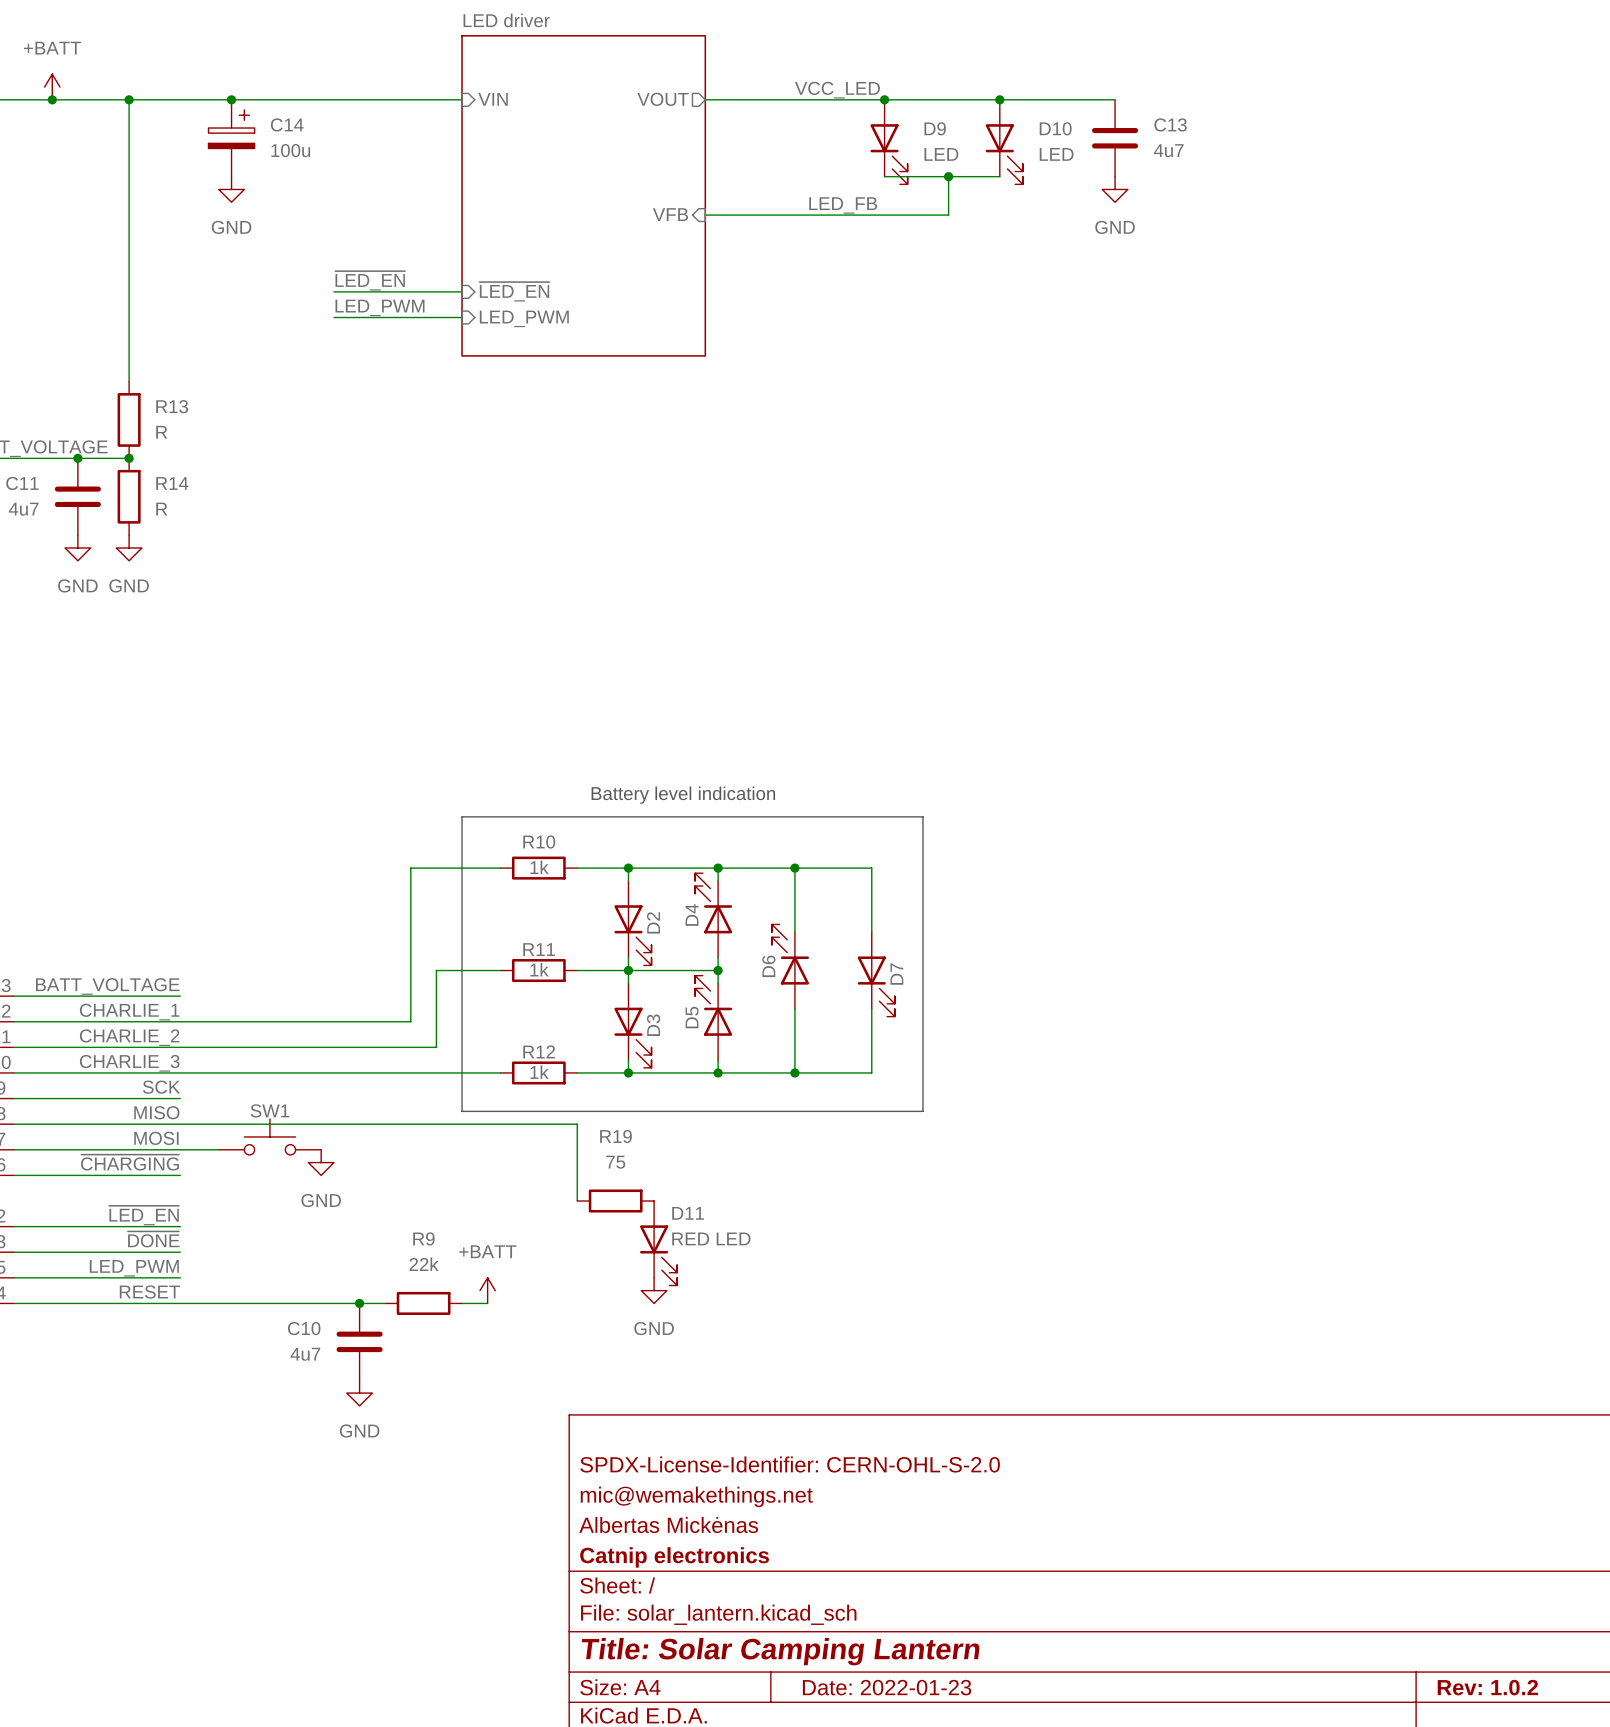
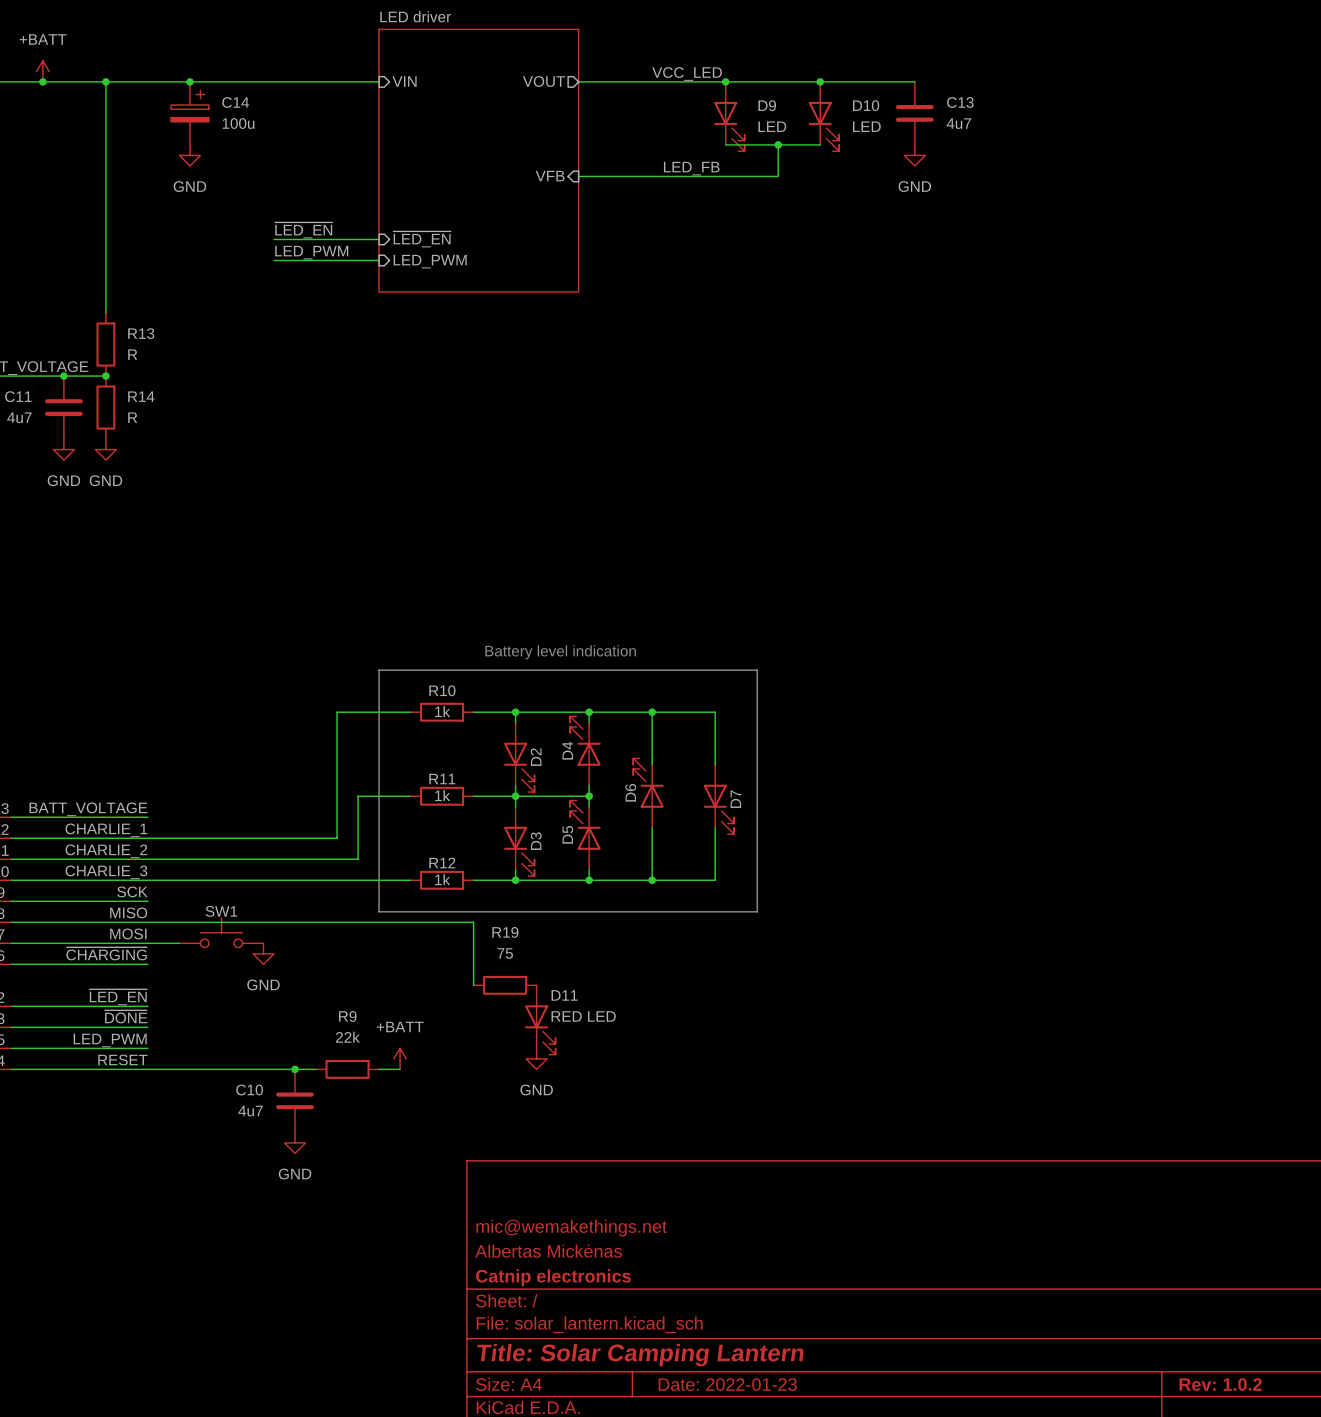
title block: SPDX-License-Identifier: CERN-OHL-S-2.0 (790, 1464) -> none

